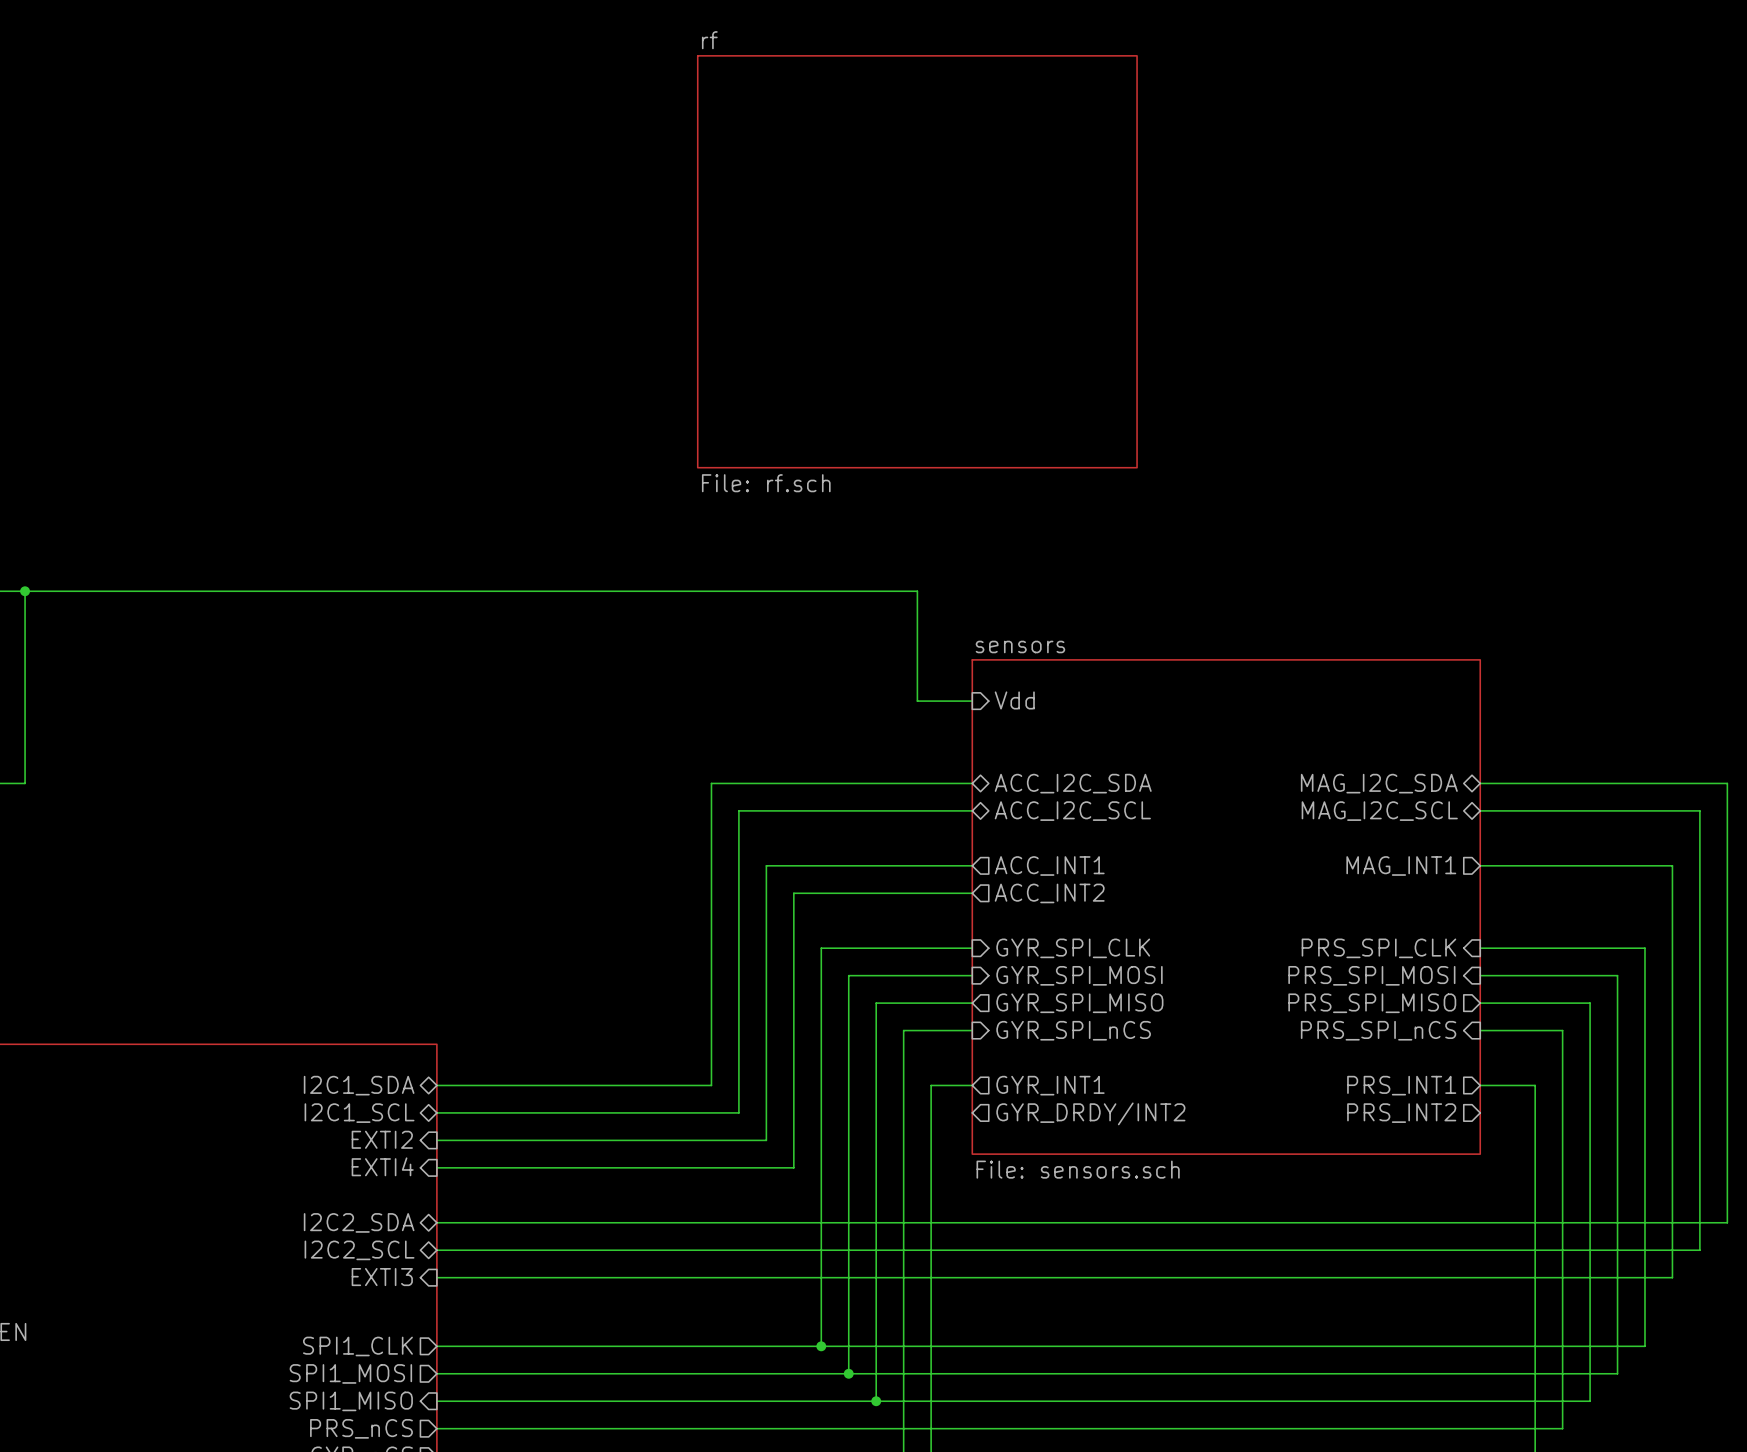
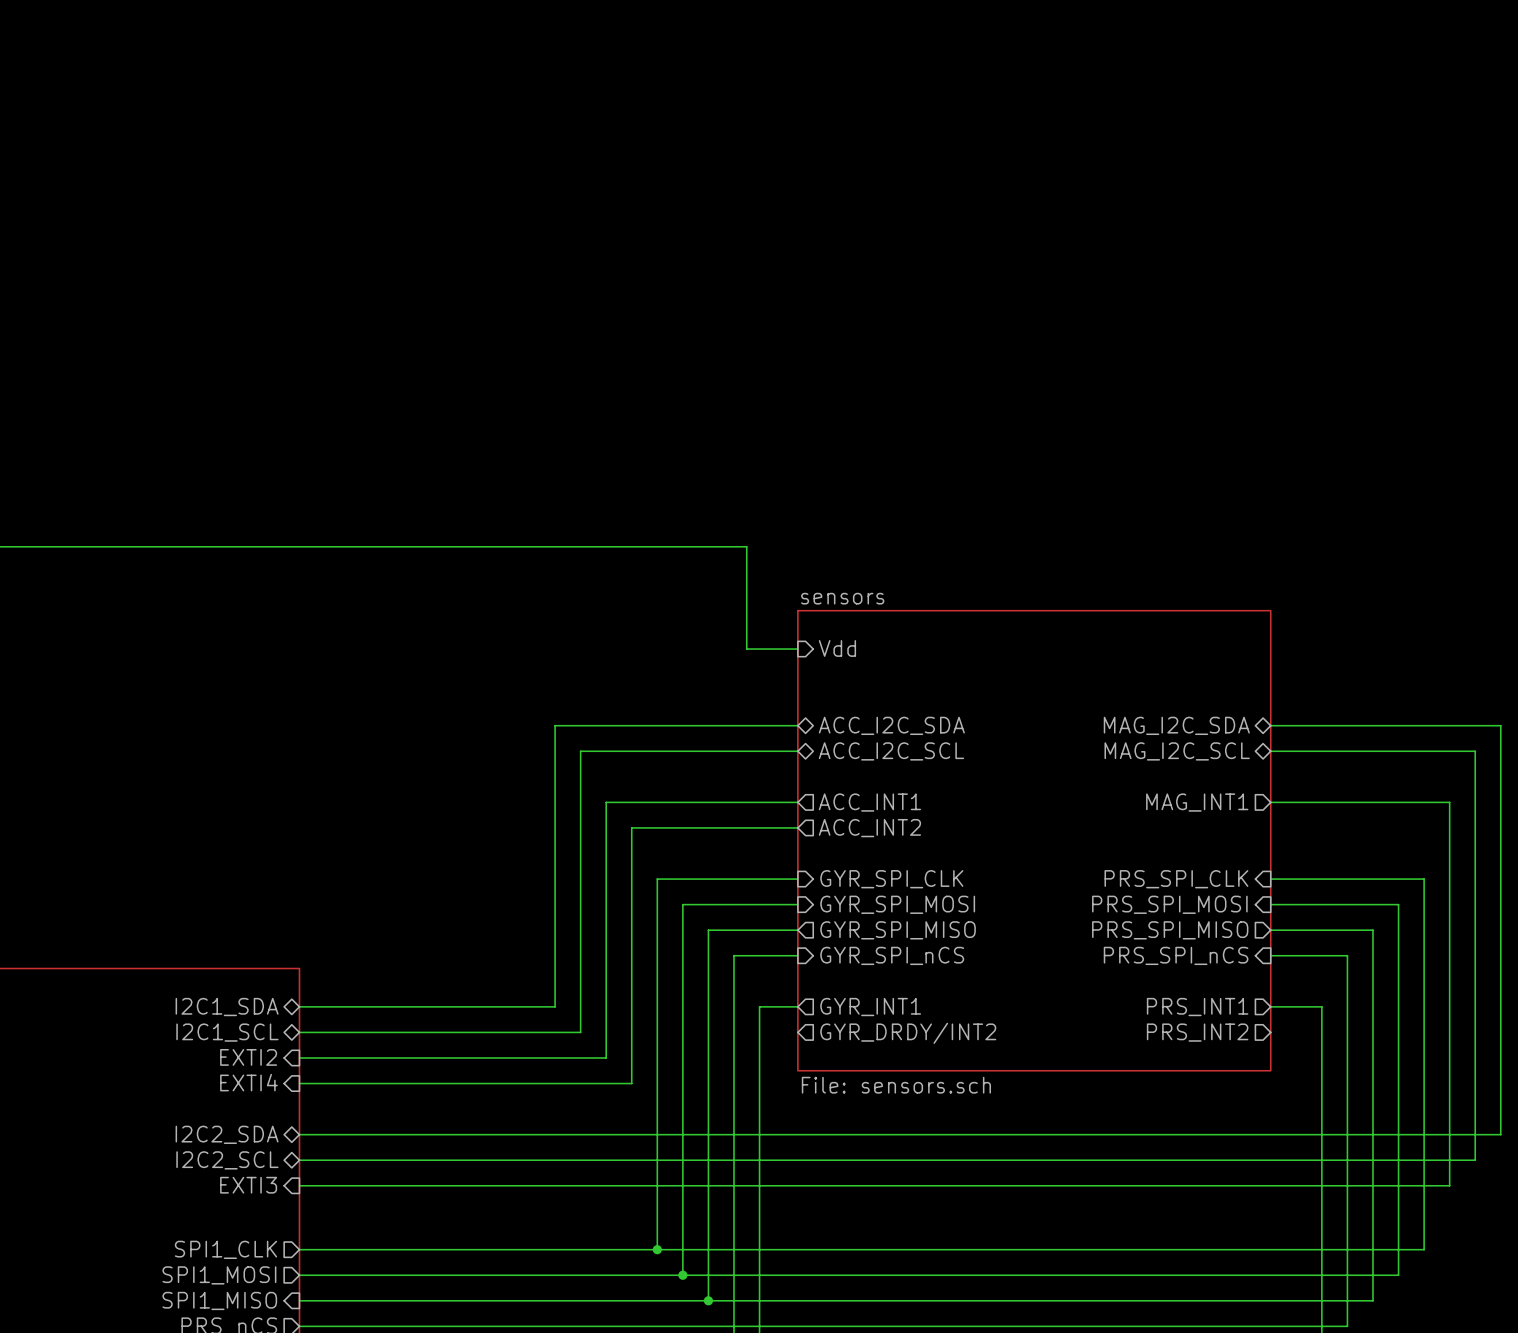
sheet rf: File: rf.sch (917, 261) -> none

